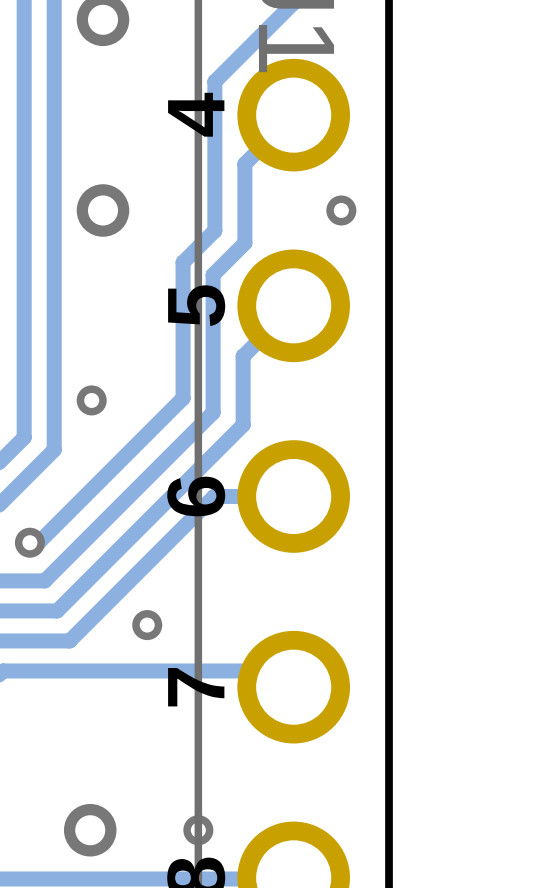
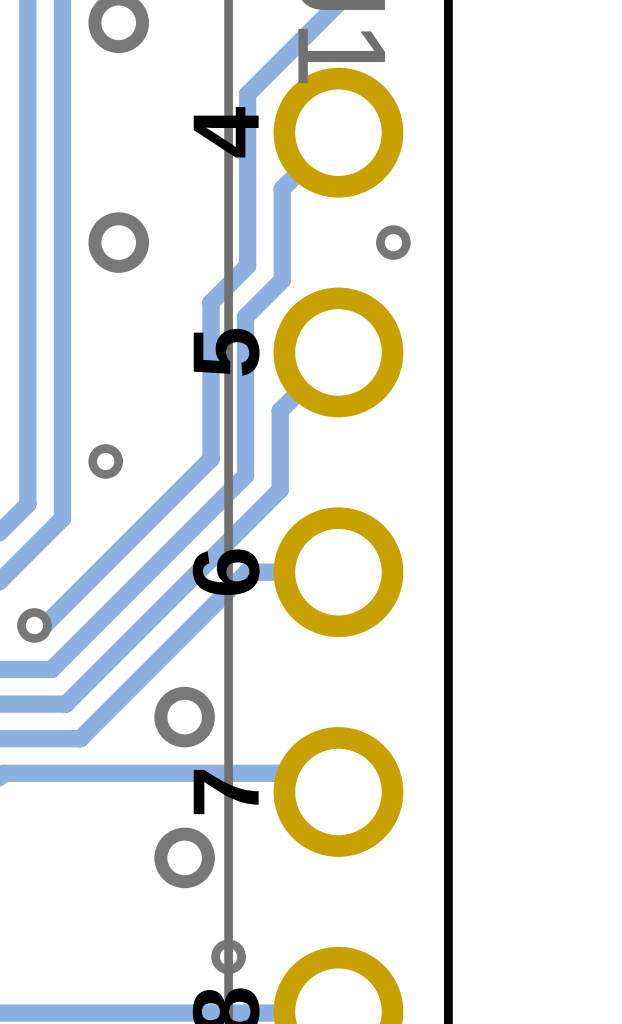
via size: [132, 610, 163, 641] -> [154, 686, 215, 748]
via: none -> (184, 857)
via: (90, 830) -> none

